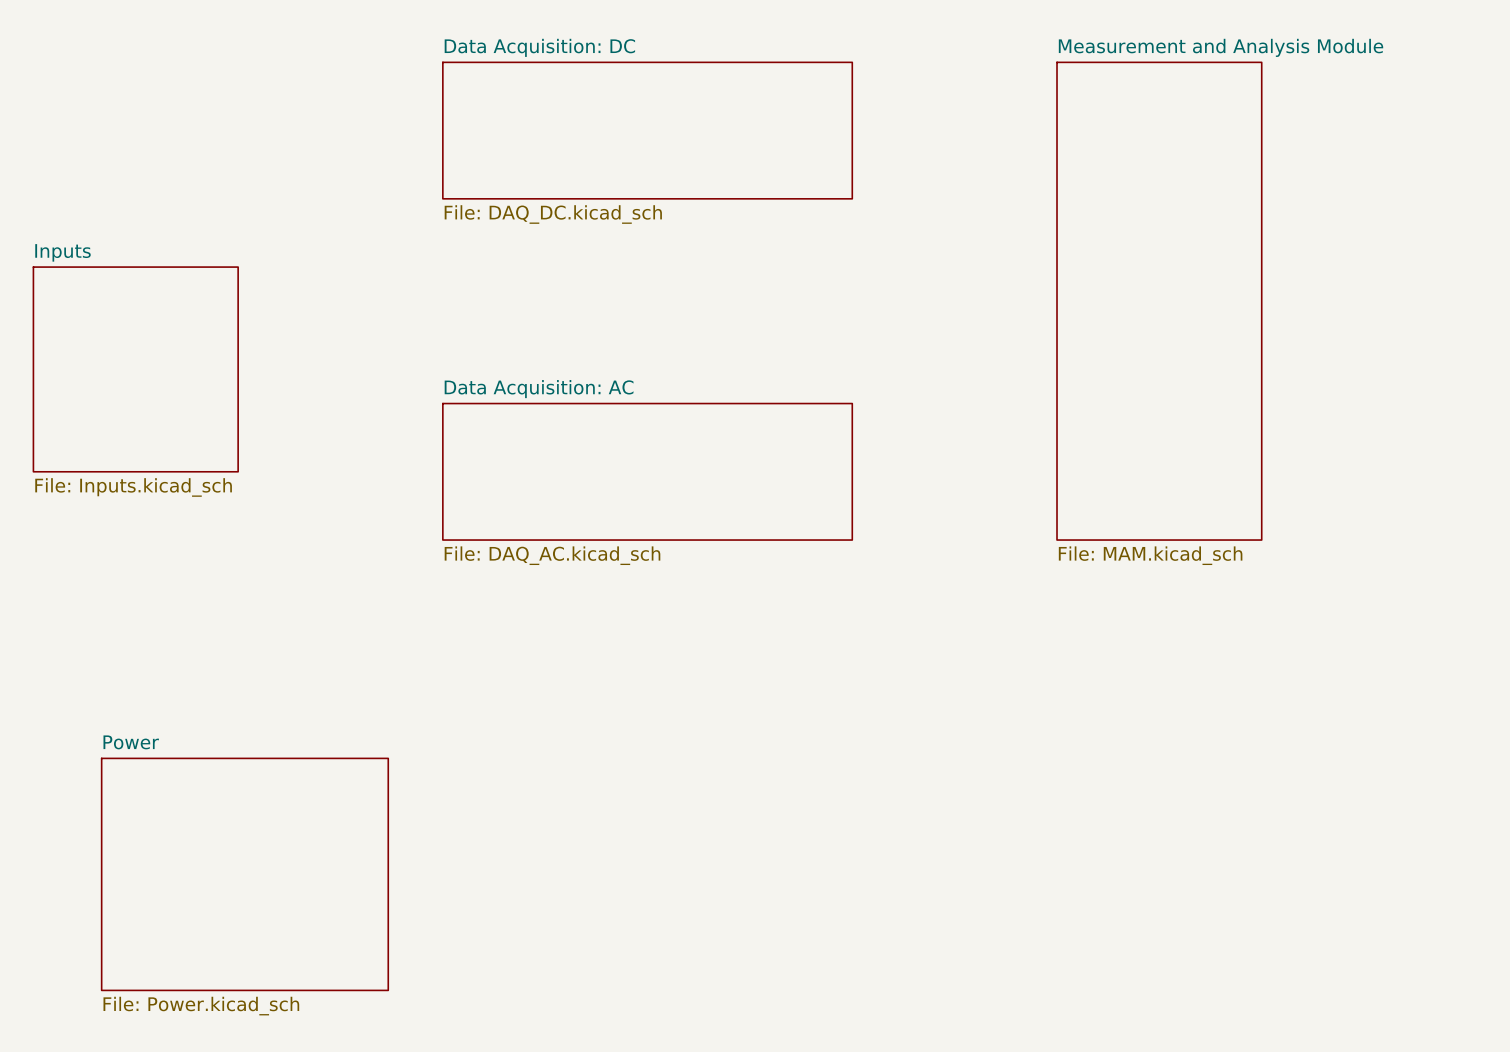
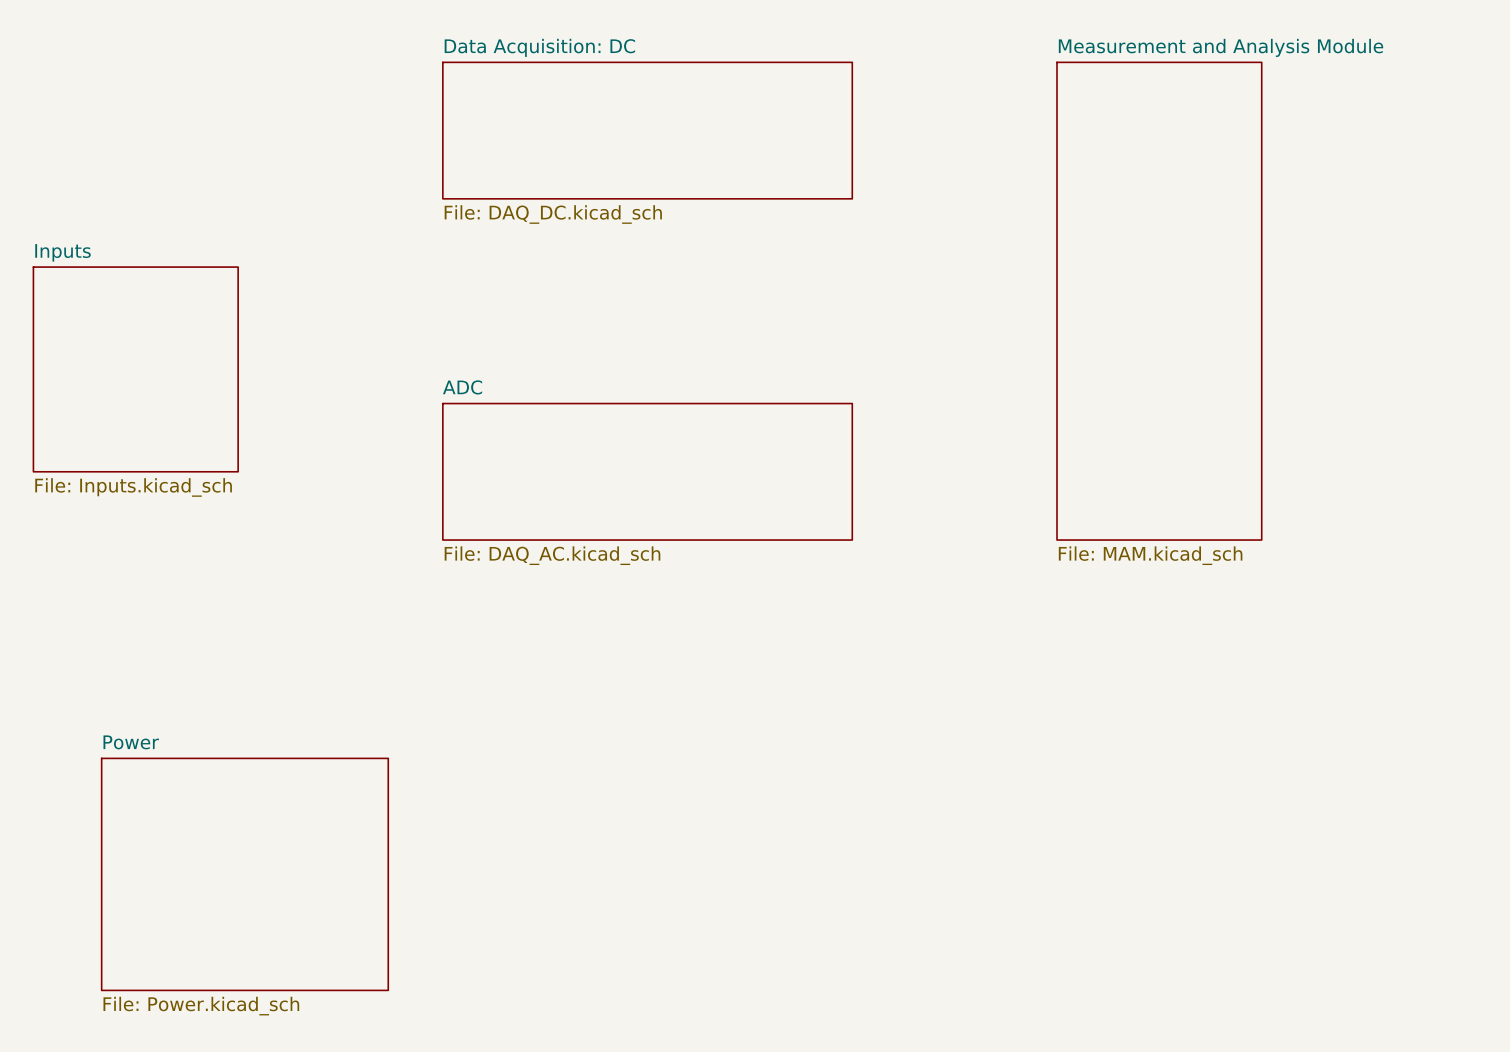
sheet ADC name: Data Acquisition: AC (539, 389) -> ADC (462, 387)

